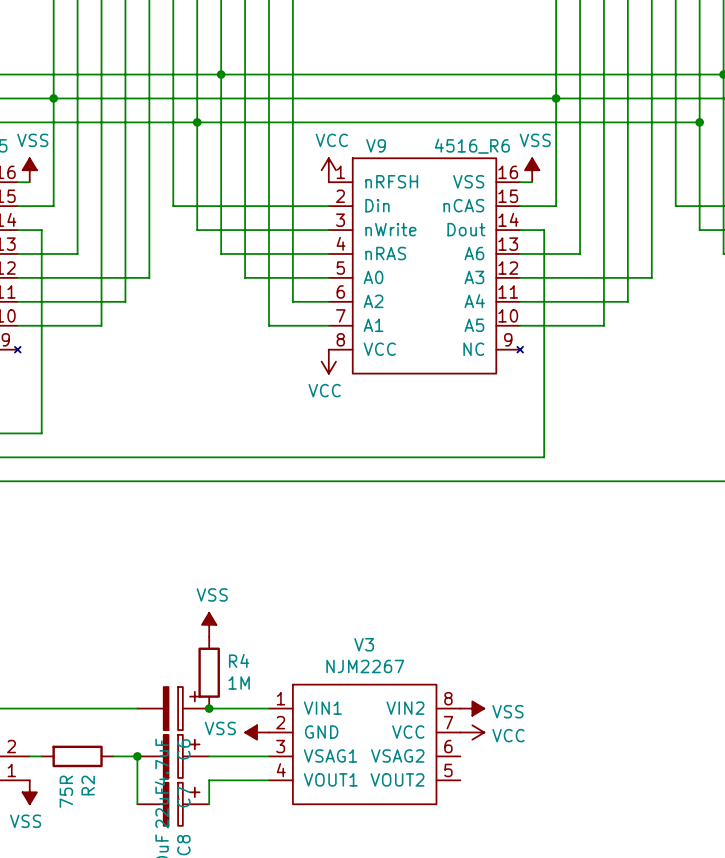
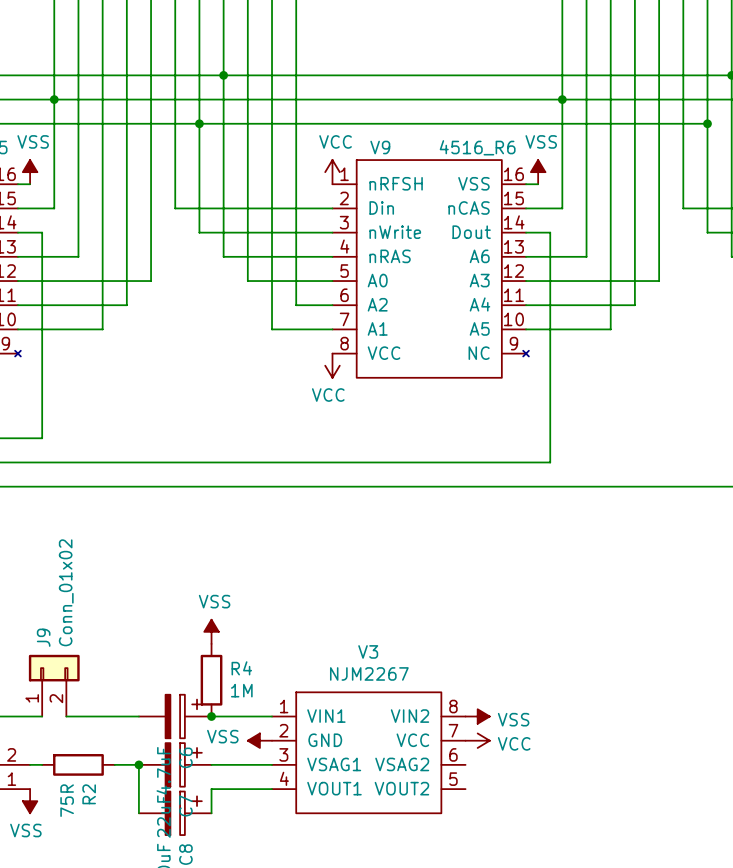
J9: none -> Conn_01x02 (54, 685)
wire: (41, 708) (65, 708) -> none

